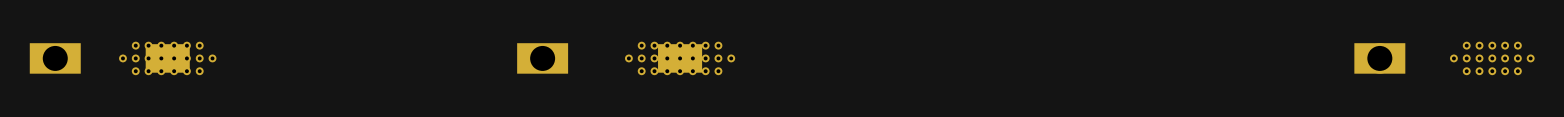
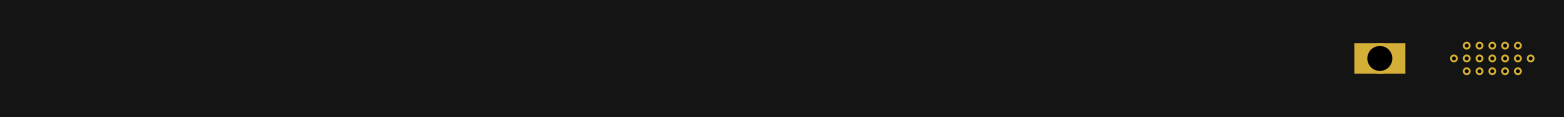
part: (55, 58) -> none
part: (167, 58) -> none
part: (542, 58) -> none
part: (680, 58) -> none

